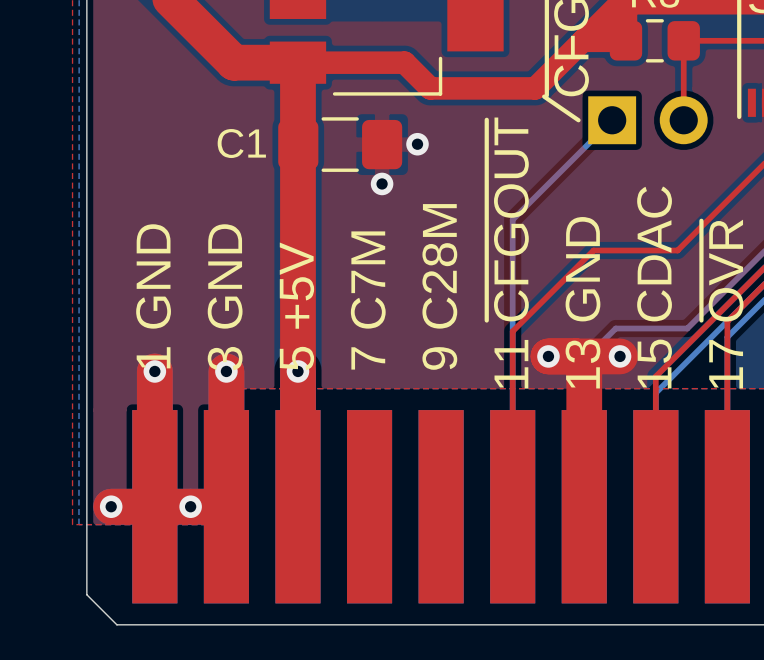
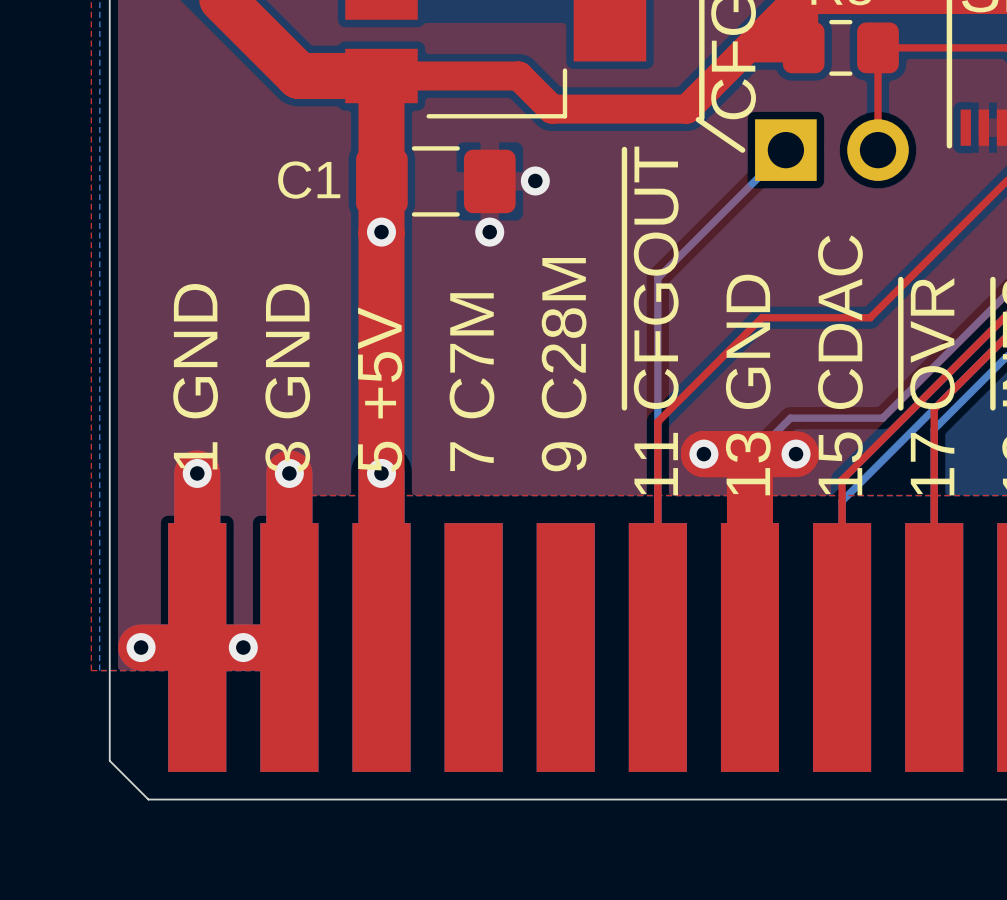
via: none -> (381, 232)

